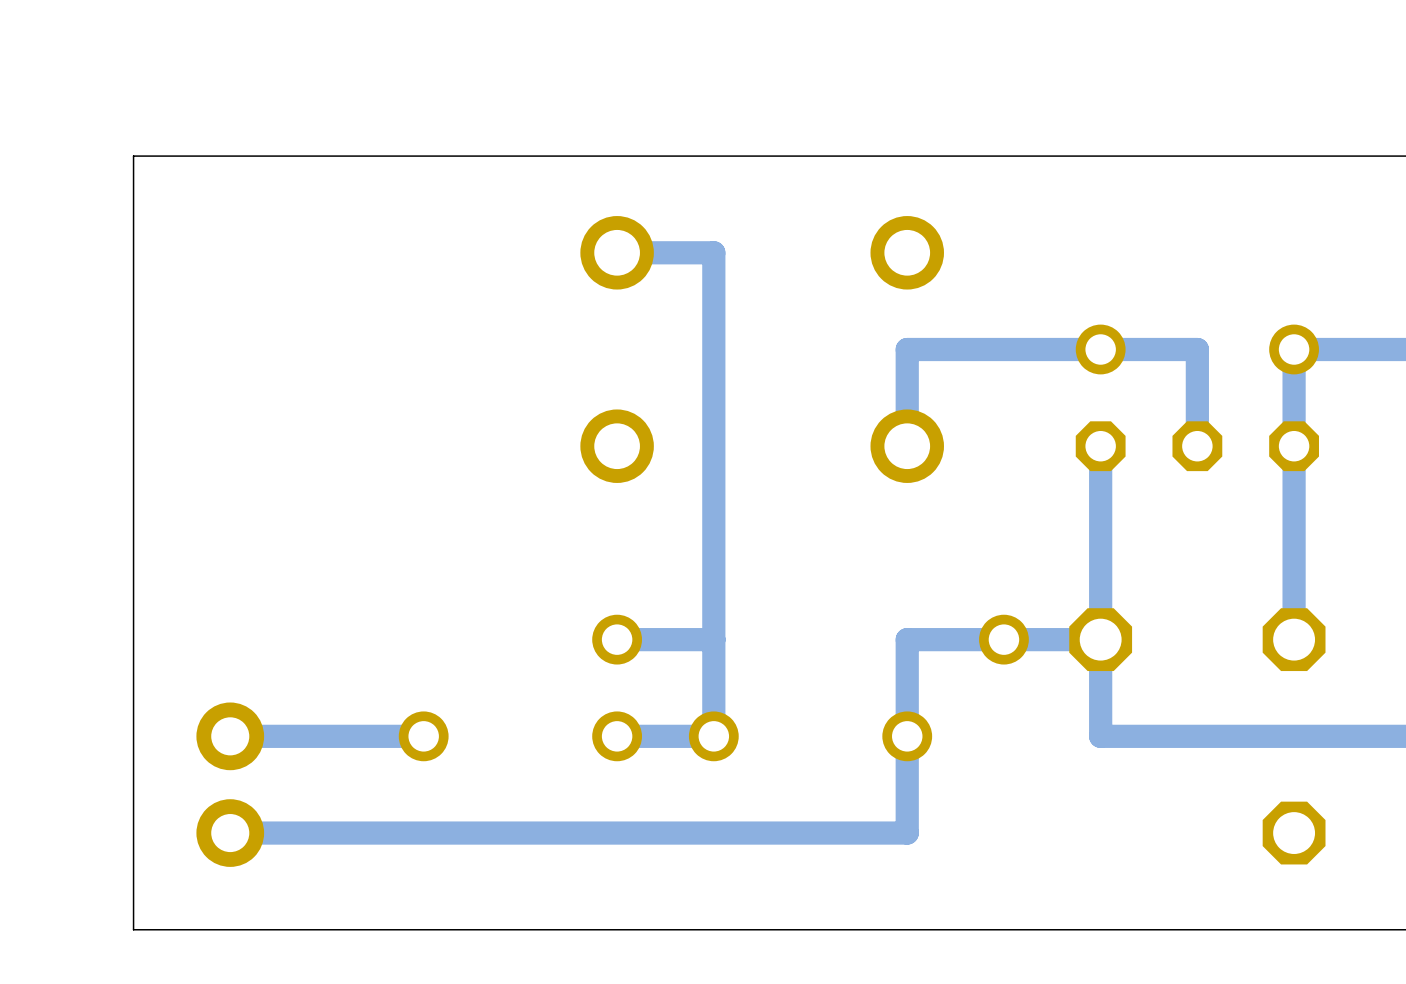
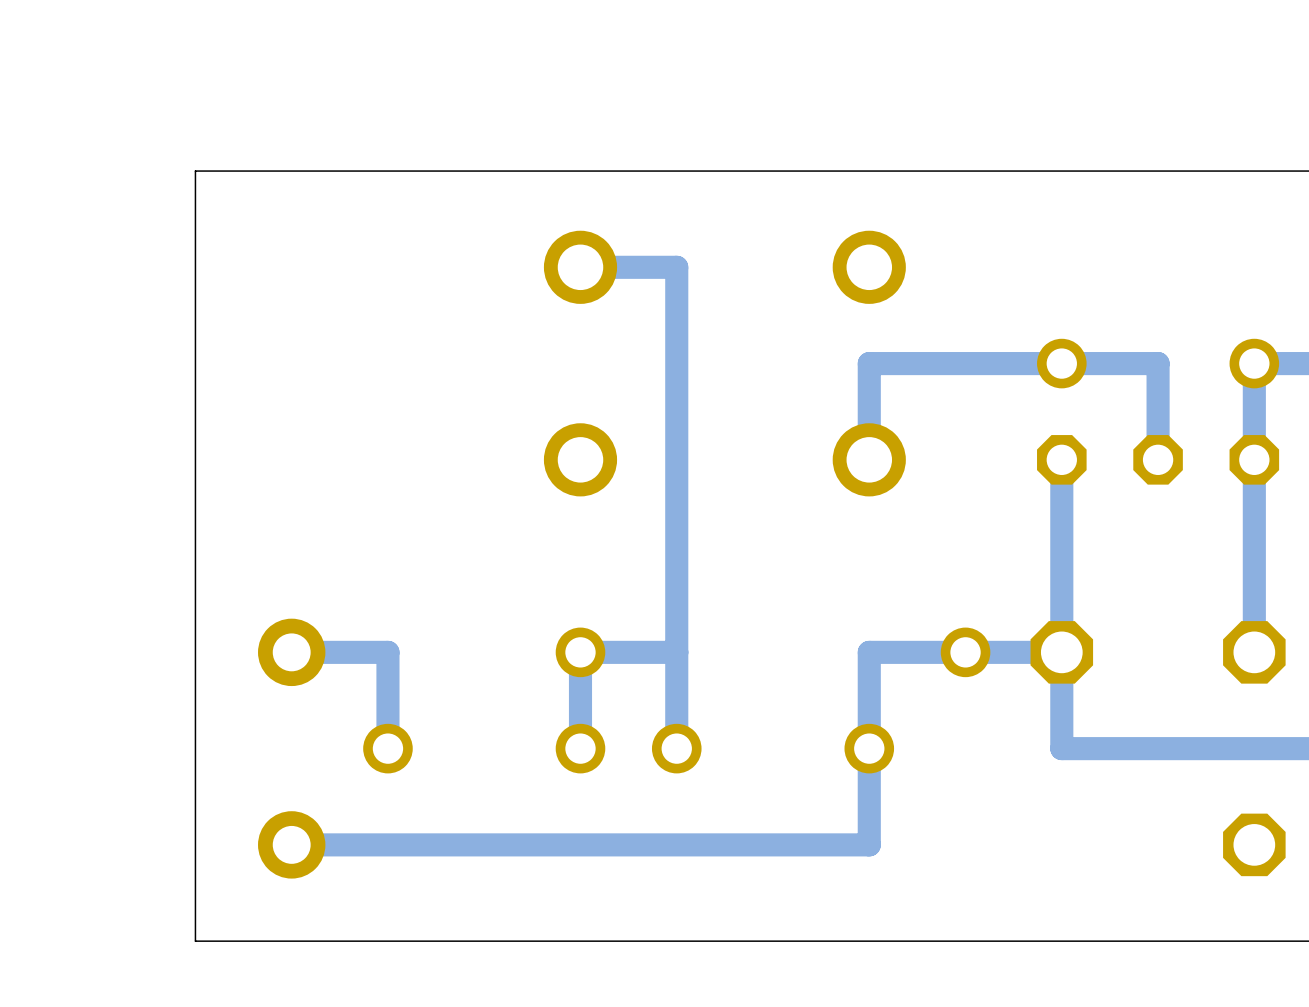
board edge: (230, 156) (133, 156) (133, 929) (230, 929) -> (195, 171) (195, 941)
part: none -> (291, 652)
part: (230, 736) -> none
bottom track: (423, 736) (230, 736) -> (387, 748) (387, 652) (291, 652)
bottom track: (713, 736) (617, 736) -> (580, 652) (580, 748)
part: (230, 833) -> none
bottom track: (326, 833) (230, 833) -> none
part: none -> (291, 844)

